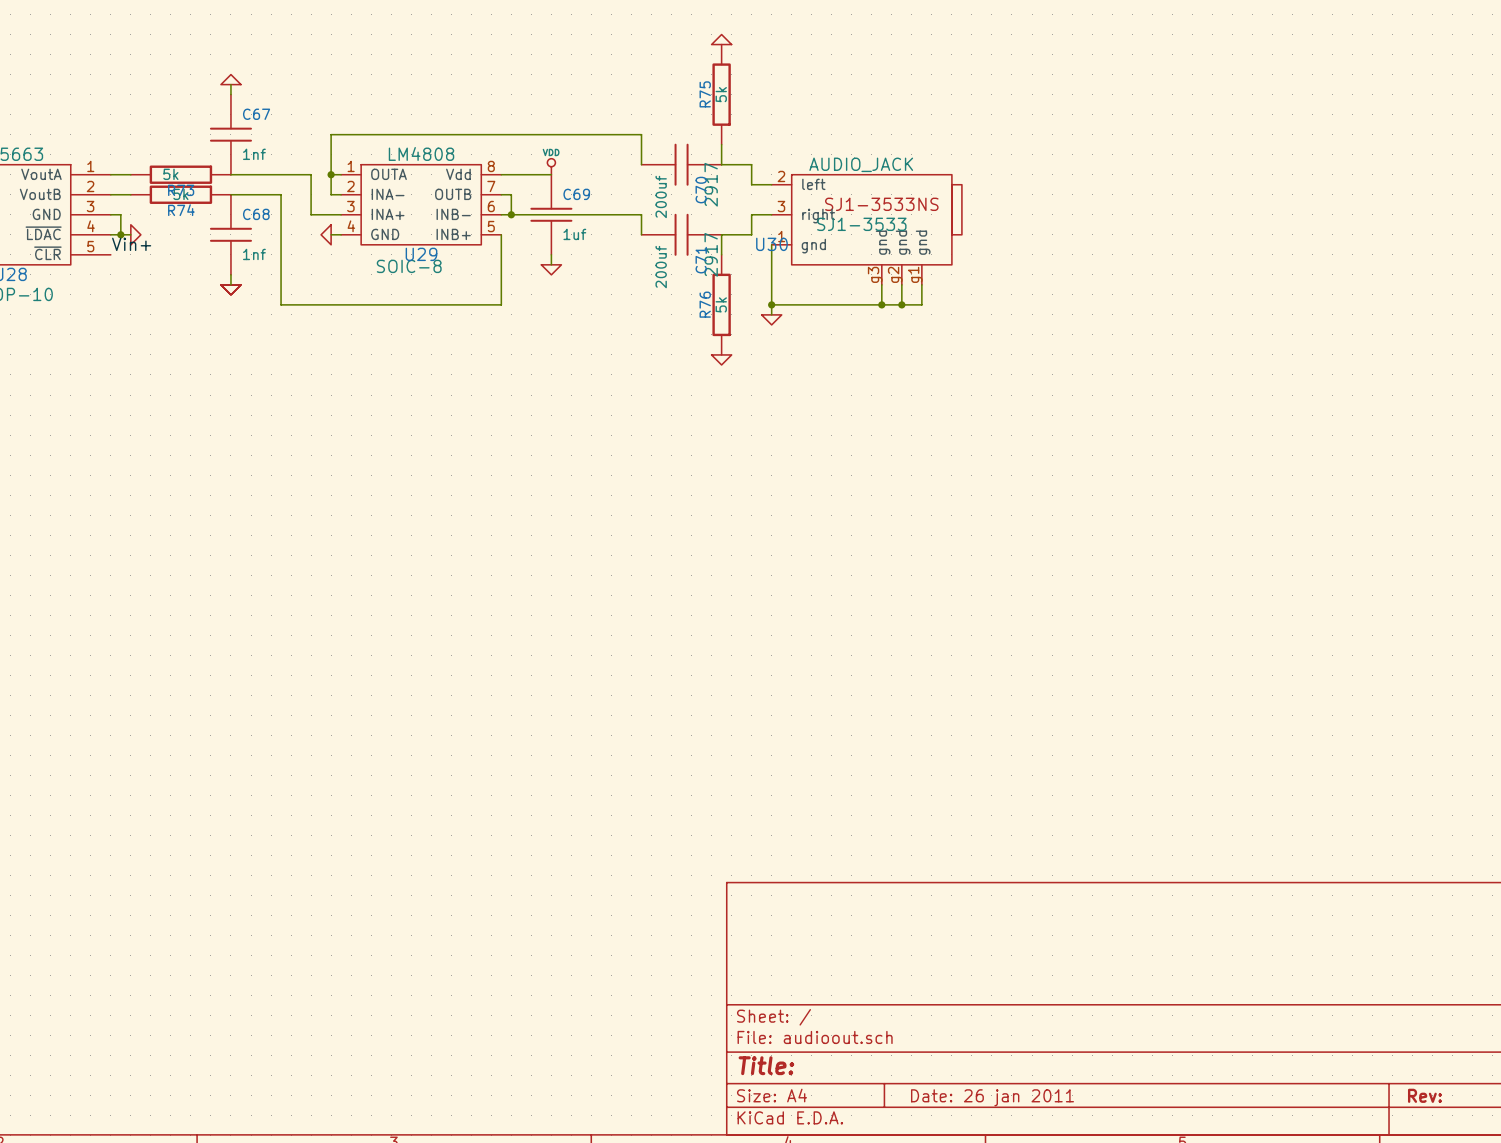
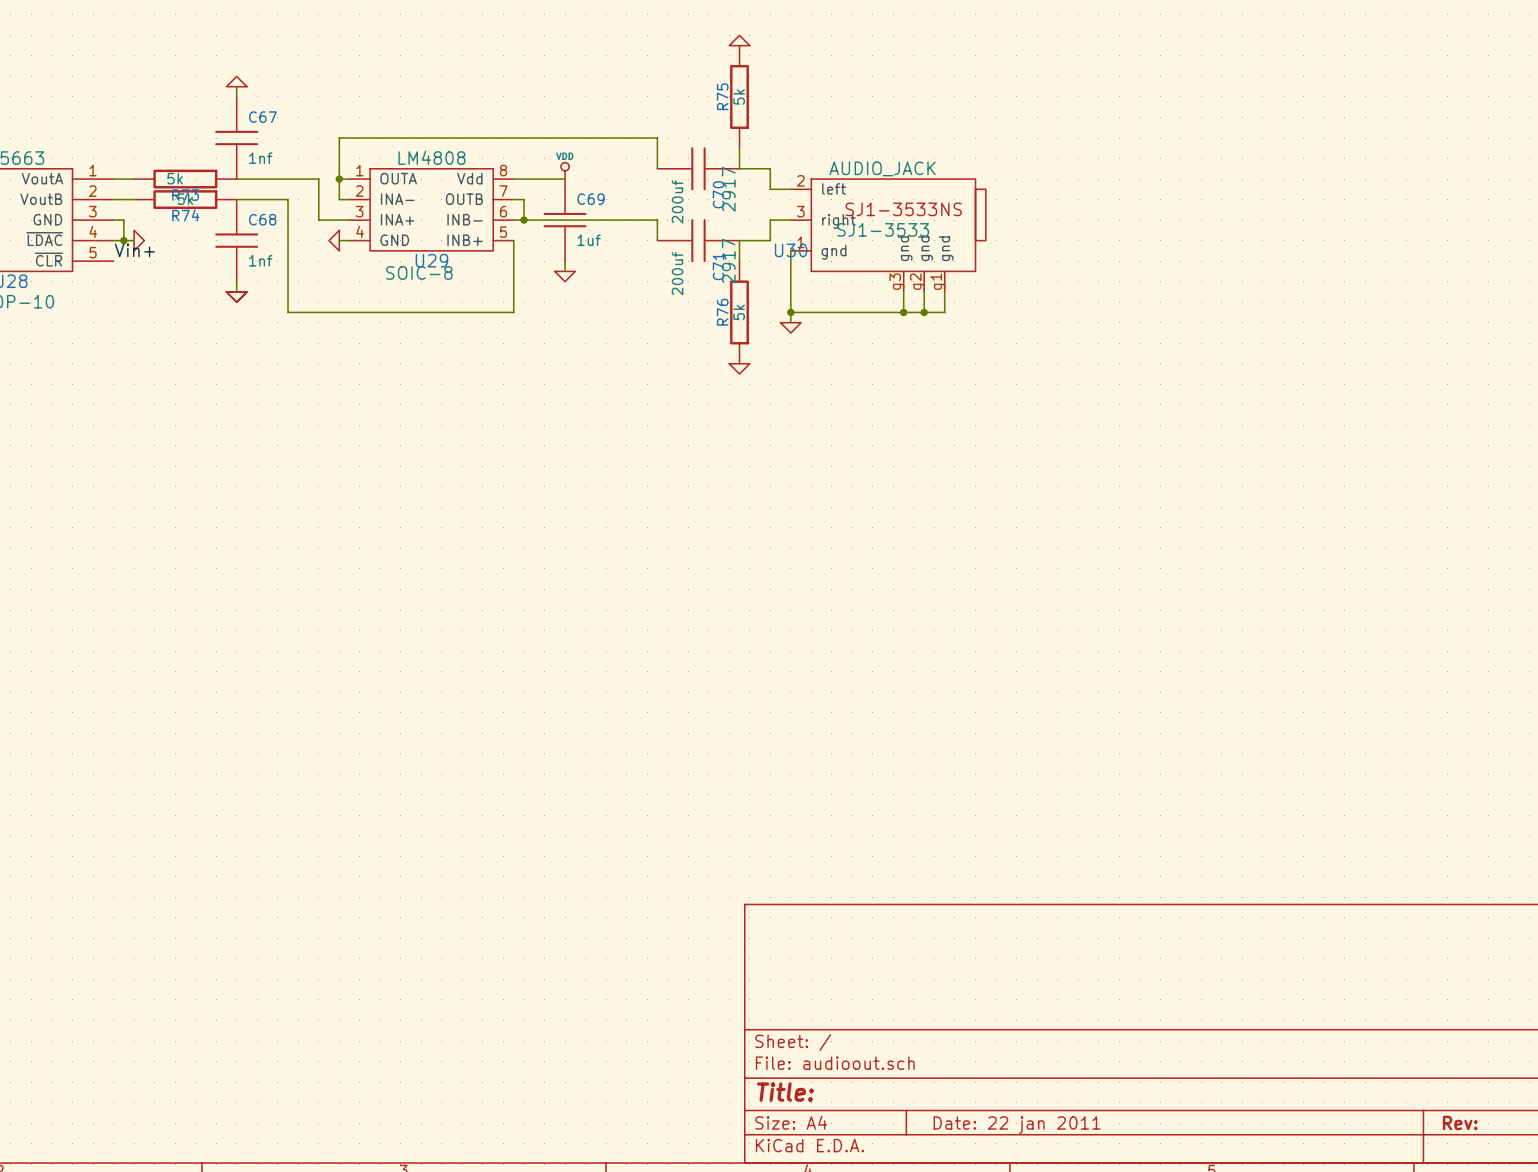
title block: Date: 26 jan 2011 (992, 1097) -> Date: 22 jan 2011 (1017, 1125)

